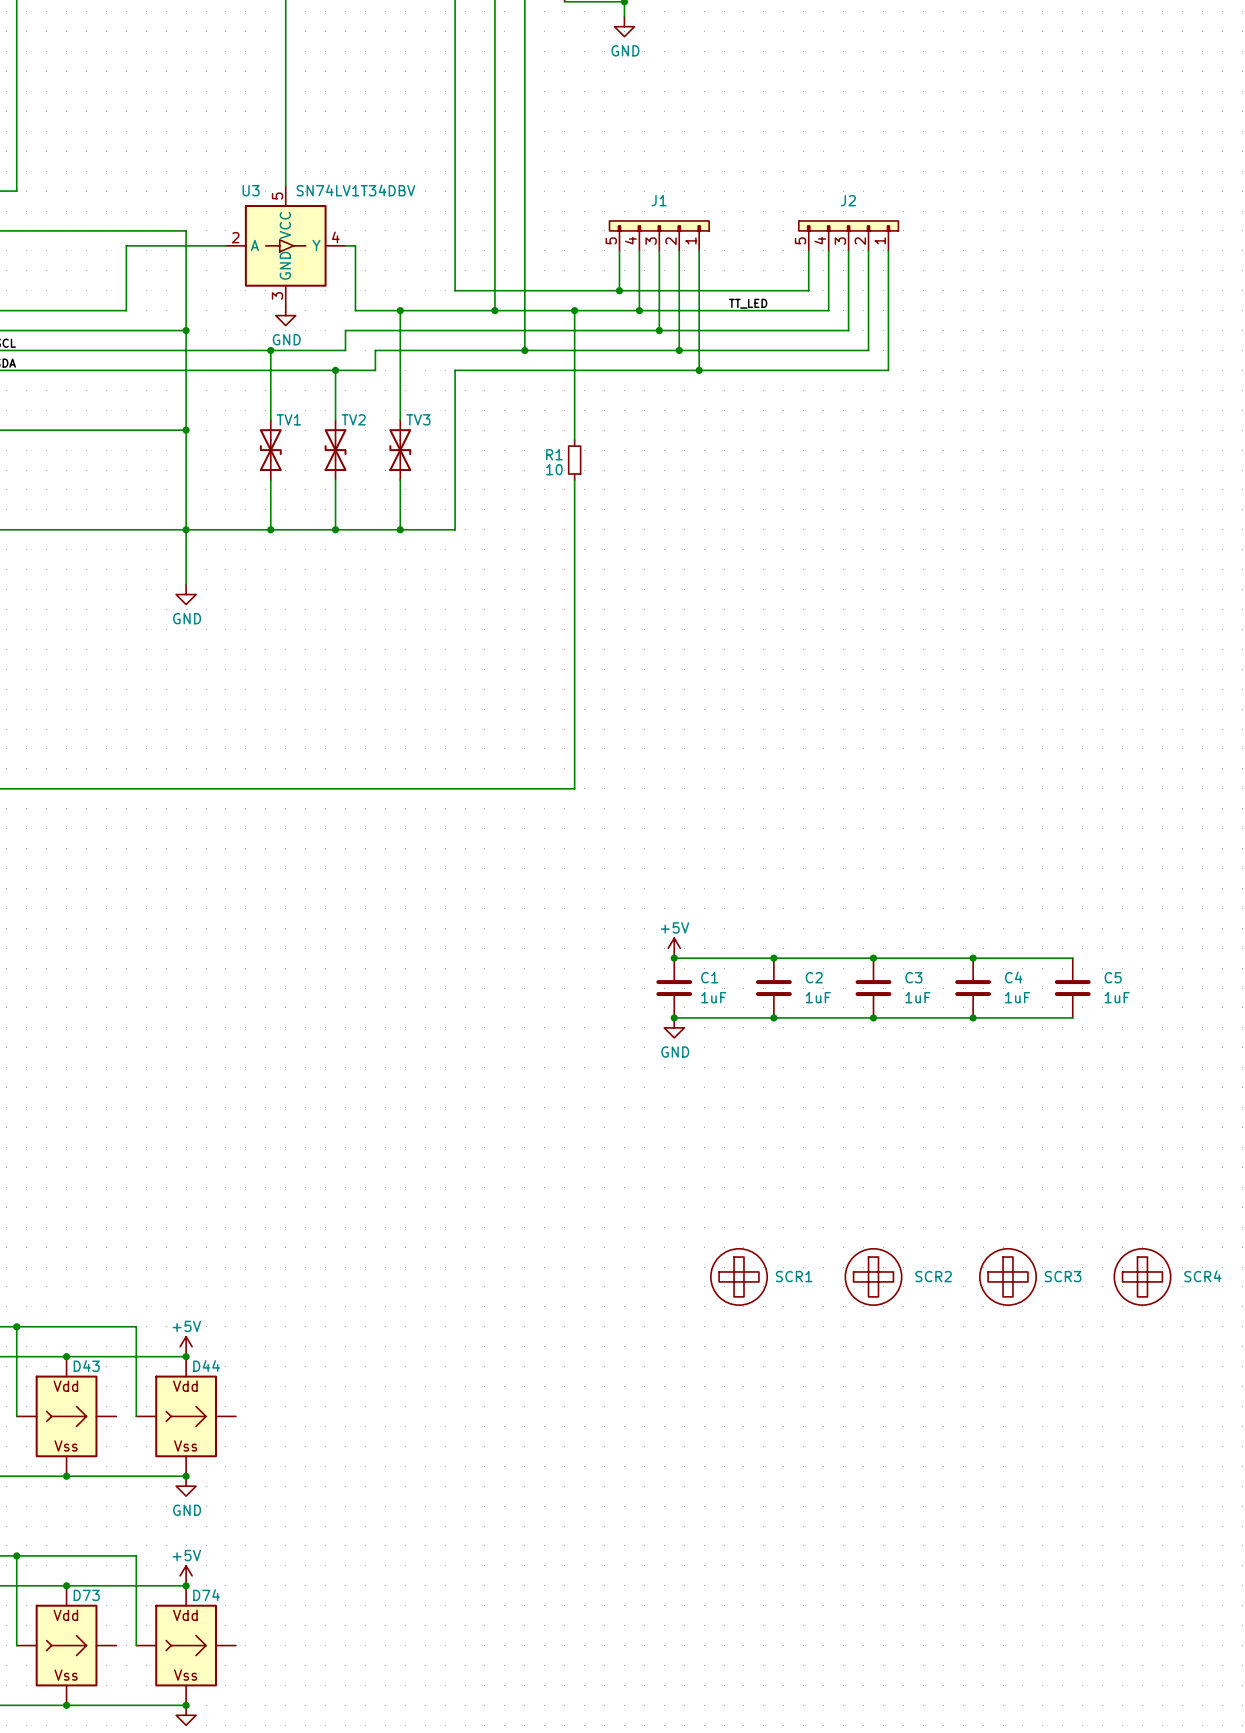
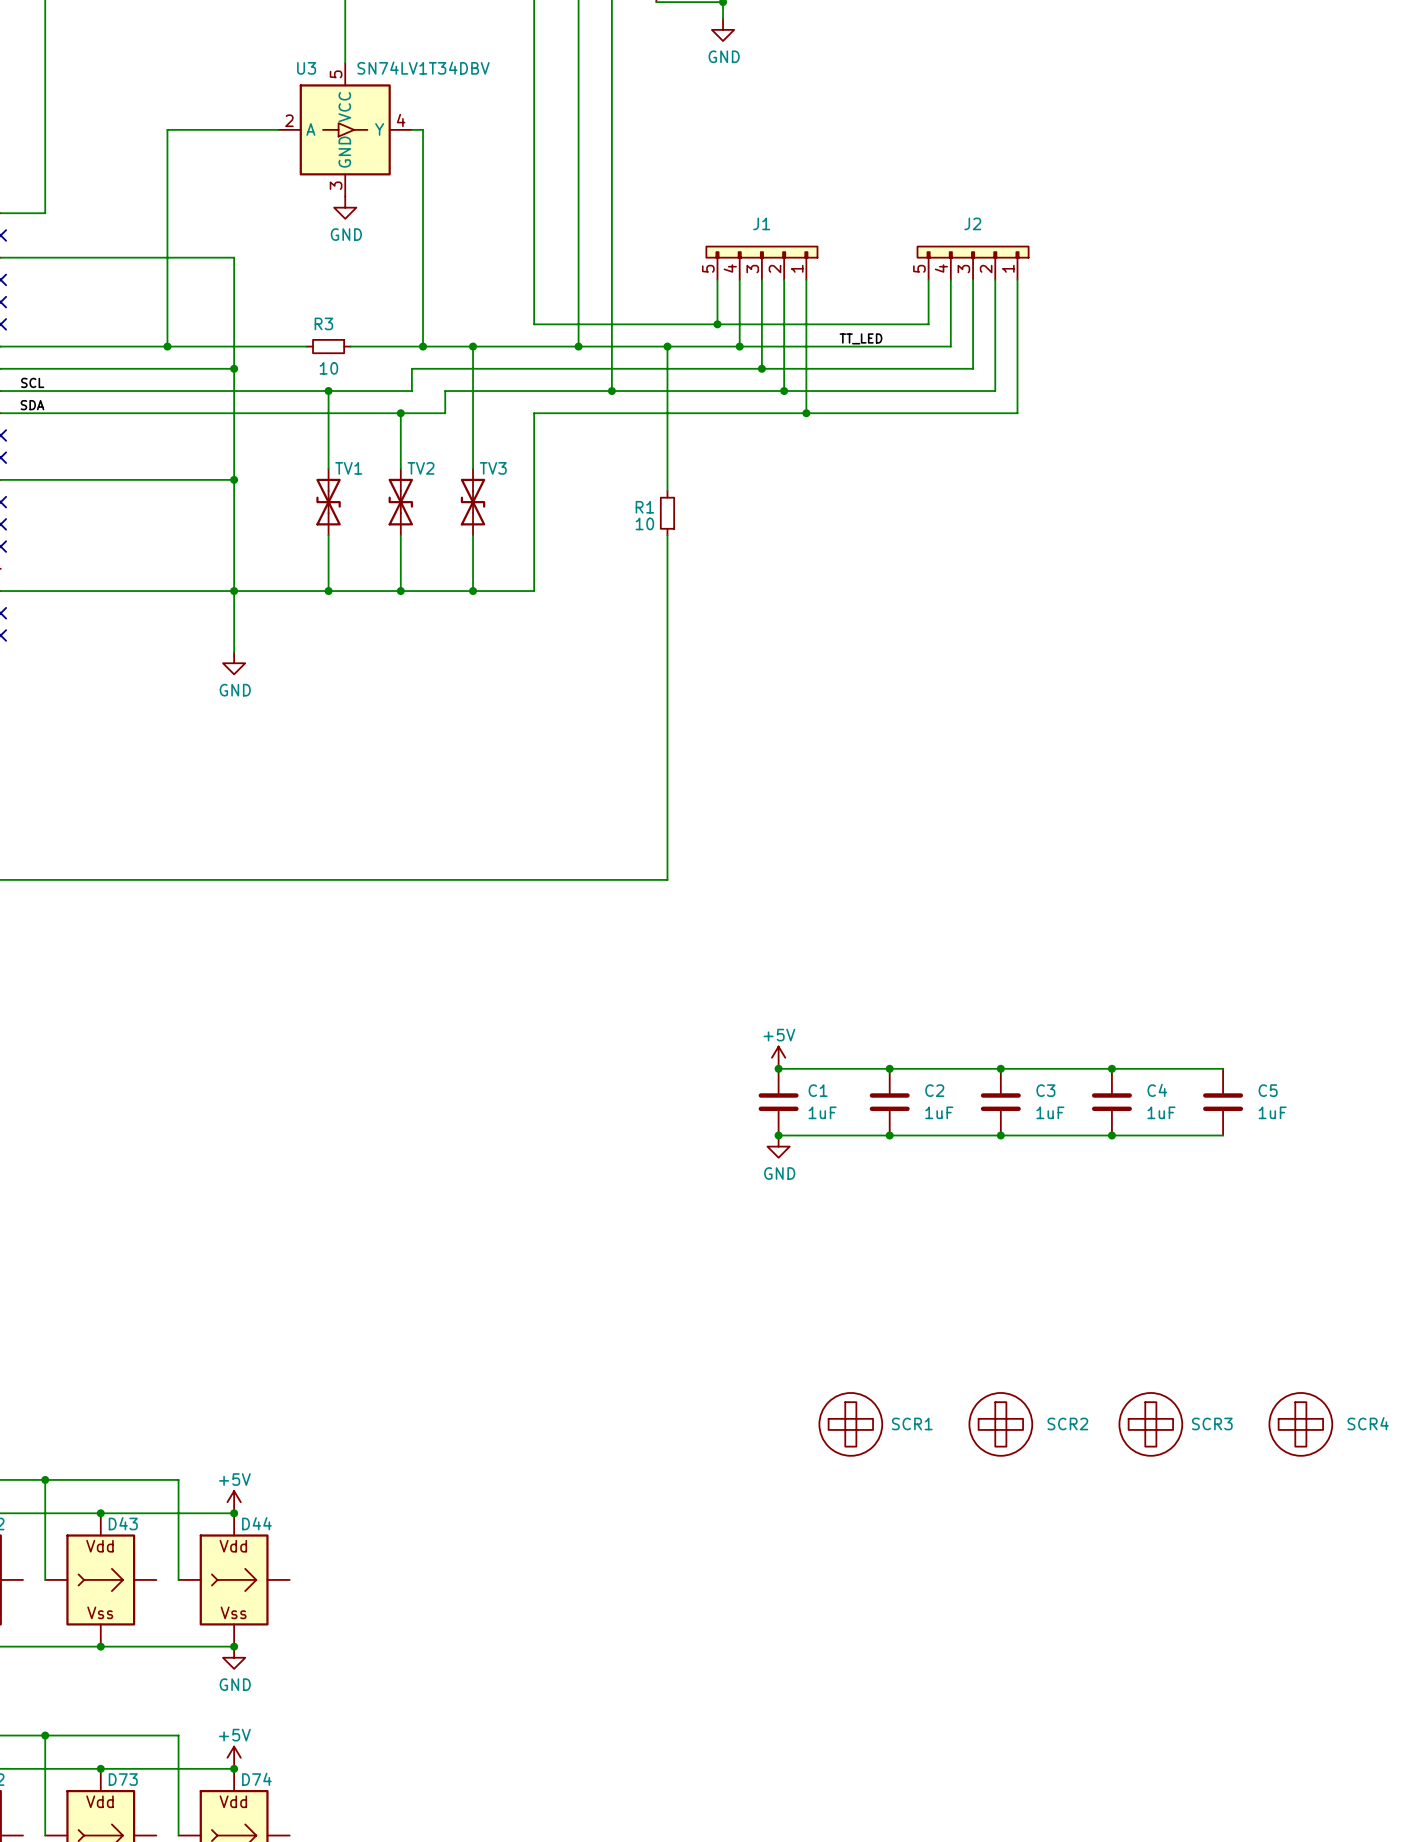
wire: (126, 245) (225, 245) -> (167, 274) (167, 129) (278, 129)
U3 position: (285, 245) -> (345, 129)
wire: (345, 245) (355, 245) -> (411, 129) (423, 129) (423, 274)
wire: none -> (167, 346) (306, 346)
junction: none -> (167, 346)
R3: none -> 10 (328, 346)
wire: none -> (350, 346) (423, 346)
junction: none -> (423, 346)
power symbol position: GND (285, 315) -> GND (345, 207)

